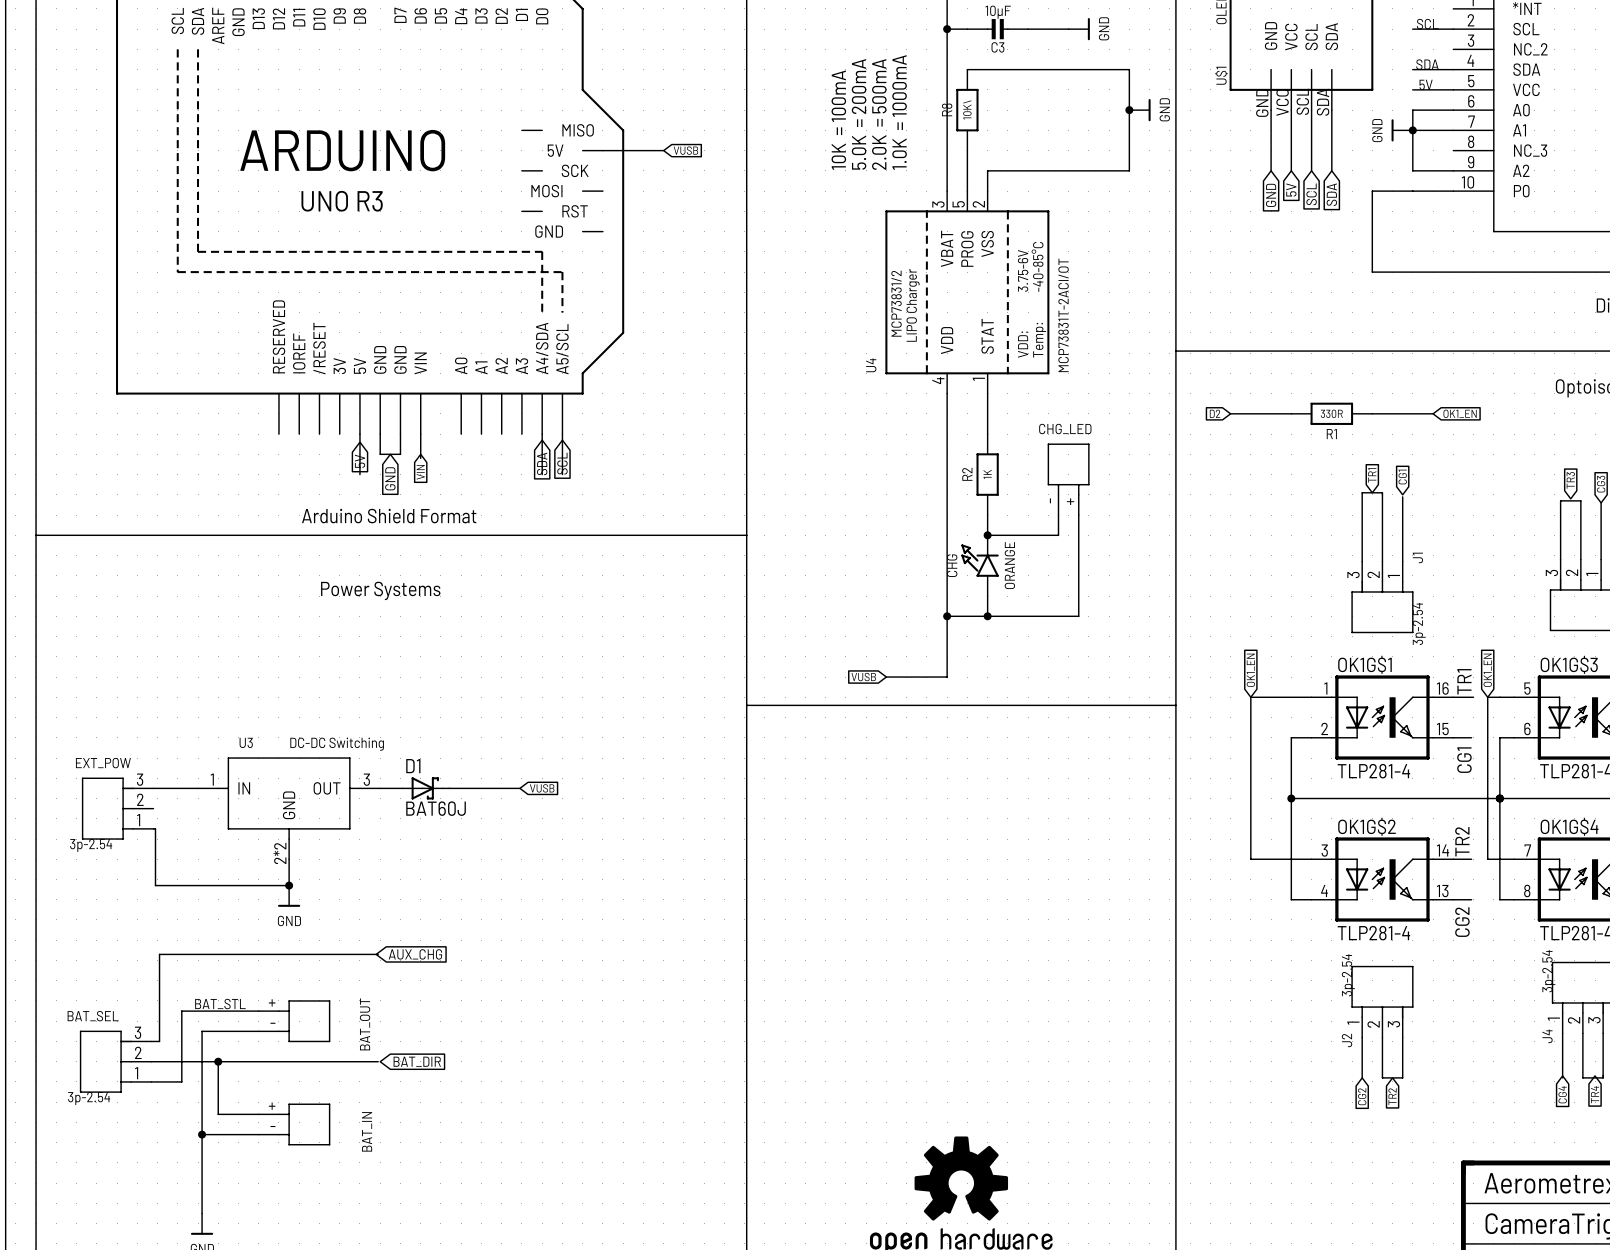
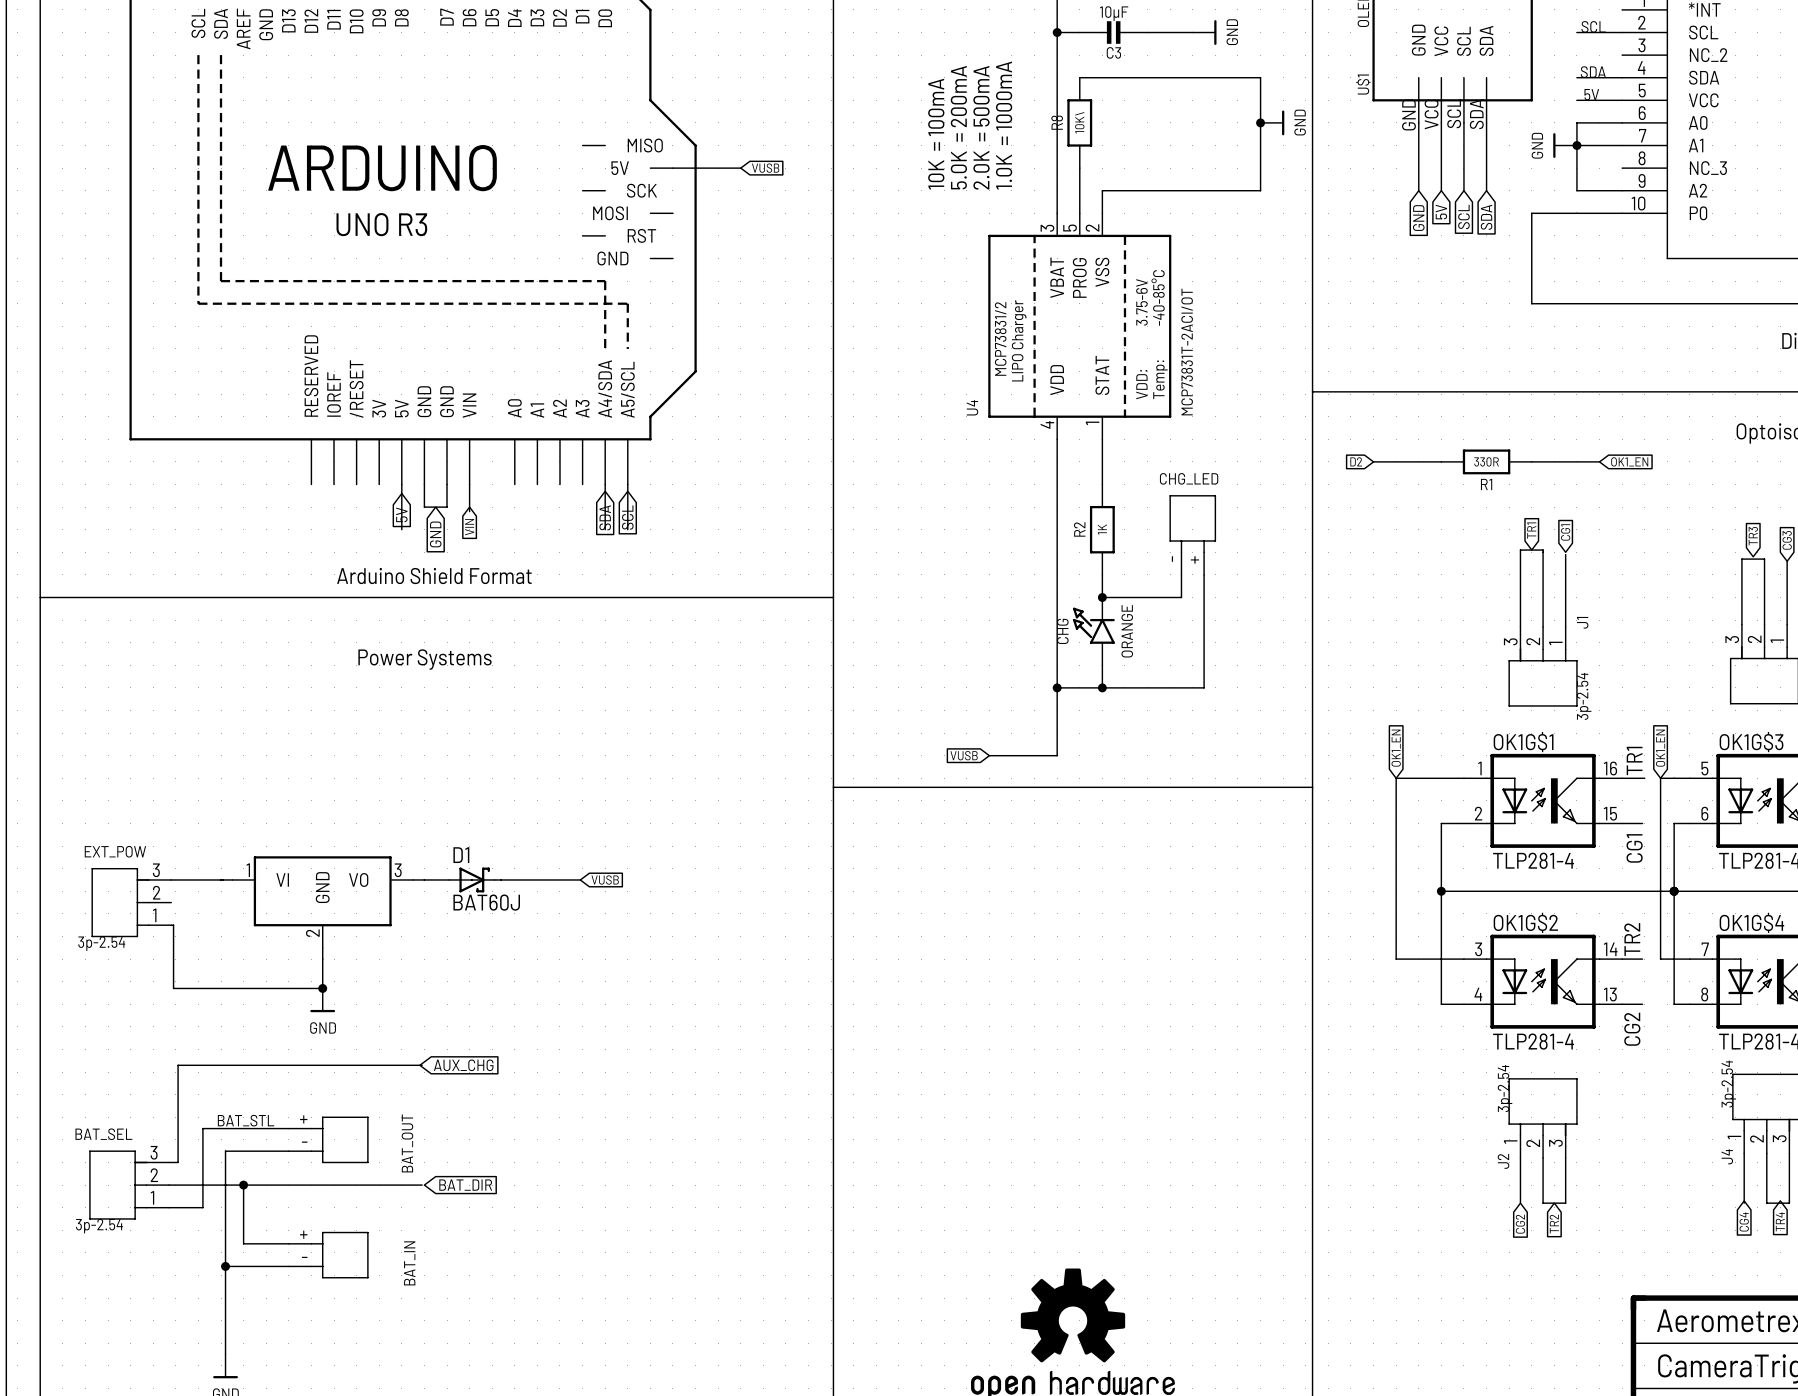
U3: DC-DC Switching (289, 808) -> none
part: none -> (322, 902)

